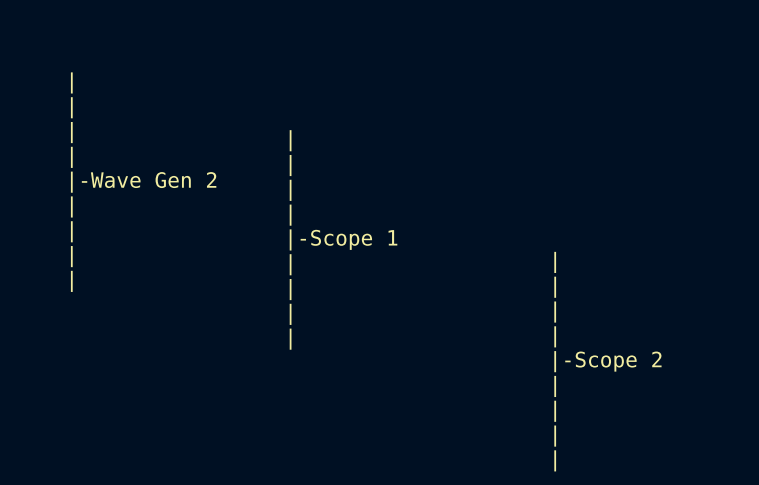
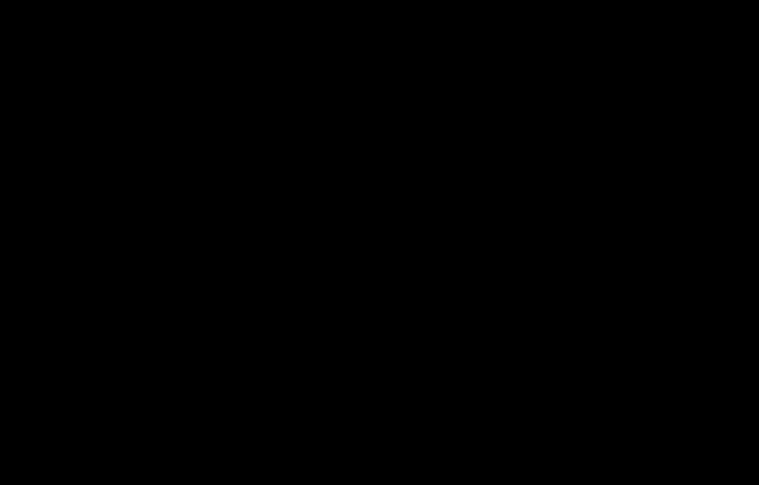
text: | (71, 82) -> none
text: | (71, 107) -> none
text: | (71, 132) -> none
text: | (290, 140) -> none
text: | (71, 157) -> none
text: | (290, 165) -> none
text: |-Wave Gen 2 (143, 182) -> none
text: | (290, 190) -> none
text: | (71, 206) -> none
text: | (290, 215) -> none
text: | (71, 231) -> none
text: |-Scope 1 (343, 239) -> none
text: | (71, 256) -> none
text: | (555, 262) -> none
text: | (290, 264) -> none
text: | (71, 281) -> none
text: | (555, 287) -> none
text: | (290, 289) -> none
text: | (555, 312) -> none
text: | (290, 314) -> none
text: | (555, 336) -> none
text: | (290, 339) -> none
text: |-Scope 2 (607, 361) -> none
text: | (555, 386) -> none
text: | (555, 411) -> none
text: | (555, 436) -> none
text: | (555, 460) -> none

